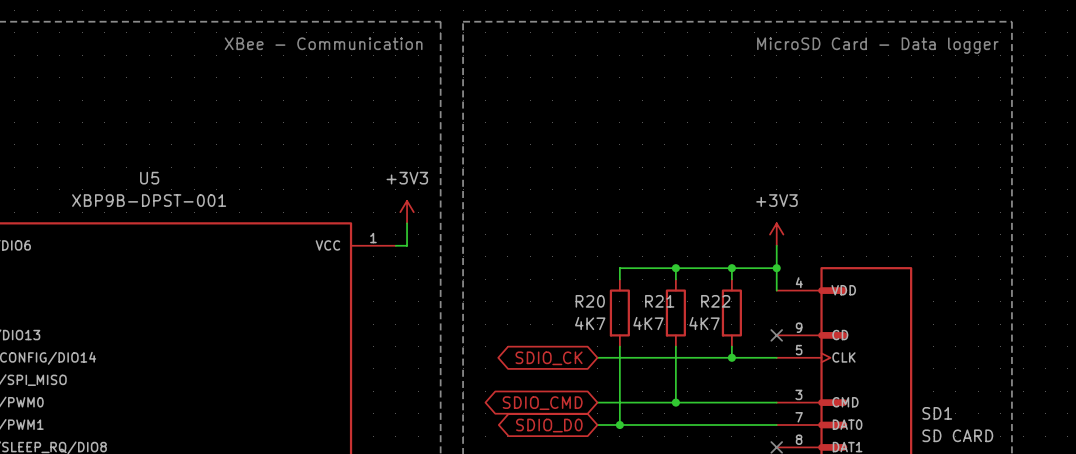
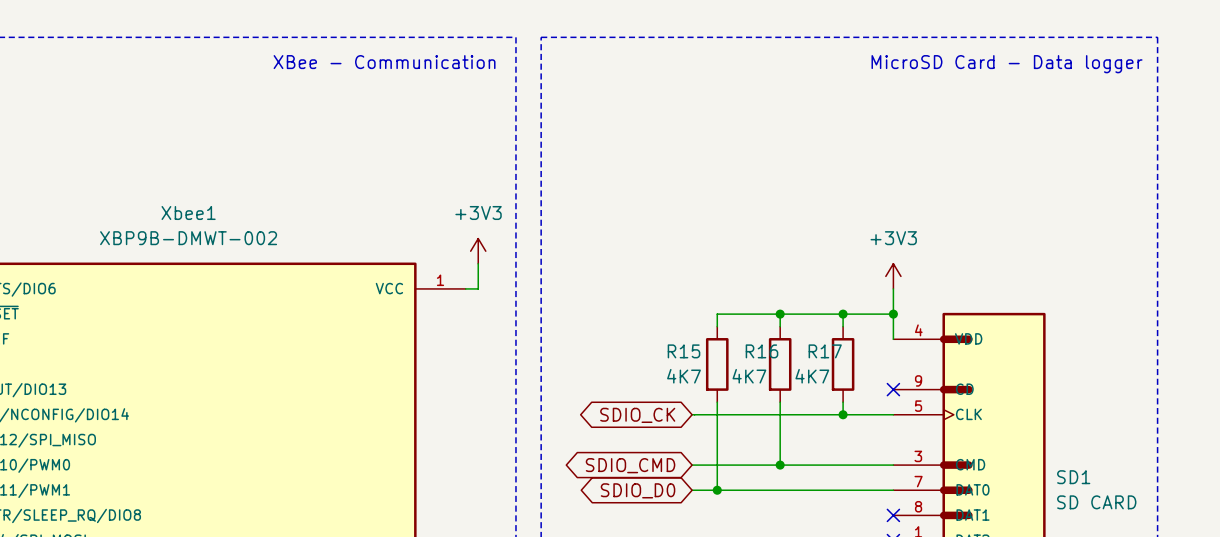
U5 name: U5 (149, 178) -> Xbee1 (188, 213)
U5 value: XBP9B-DPST-001 (149, 200) -> XBP9B-DMWT-002 (188, 238)
R20 name: R20 (590, 301) -> R15 (684, 351)
R21 name: R21 (659, 301) -> R16 (762, 351)
R22 name: R22 (715, 301) -> R17 (825, 351)

